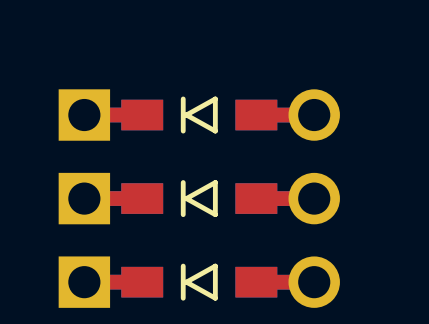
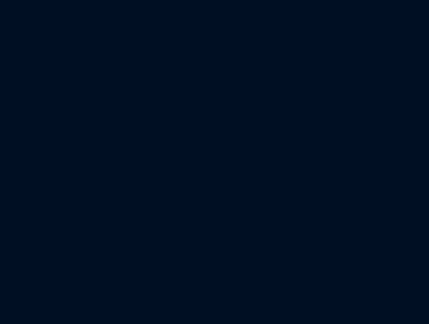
part: (199, 115) -> none
part: (199, 198) -> none
part: (199, 282) -> none

